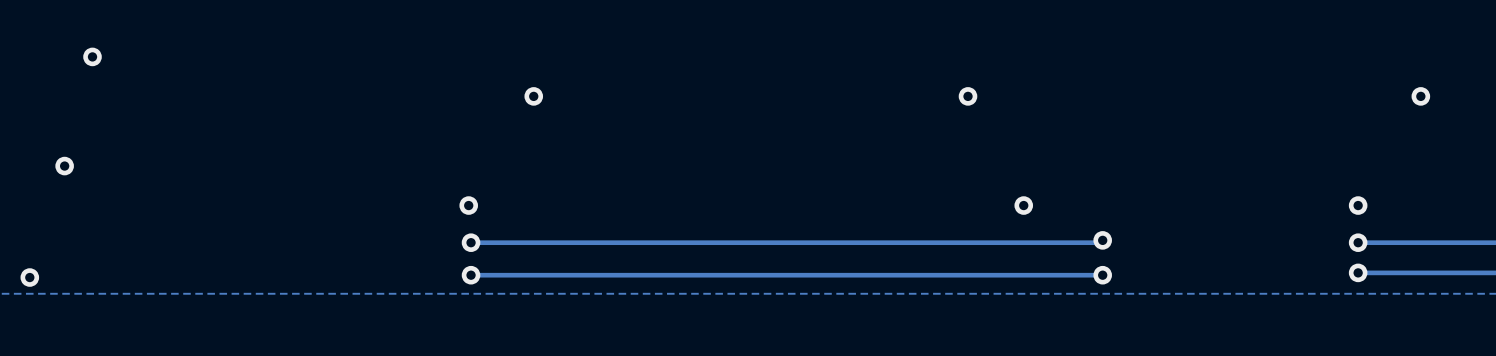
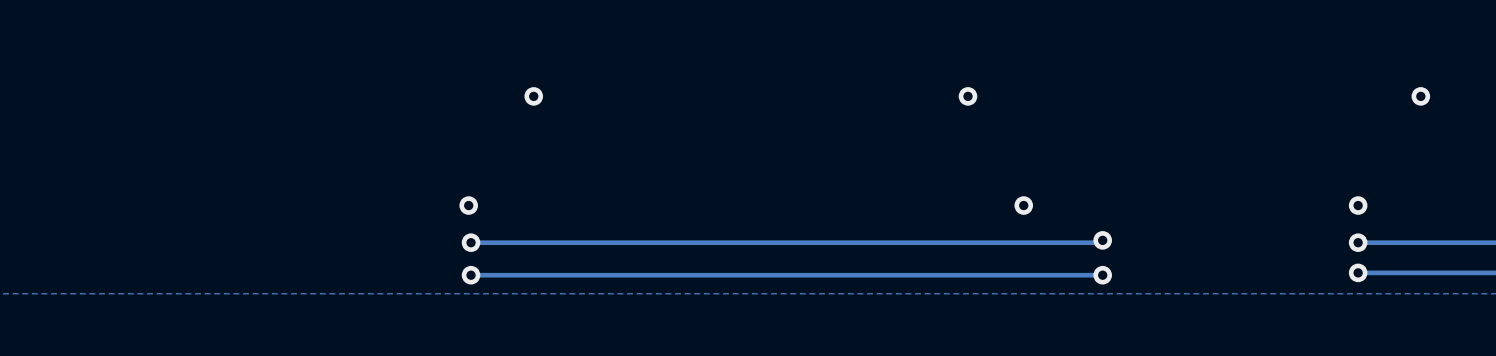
via: (92, 56) -> none
via: (64, 166) -> none
via: (29, 277) -> none

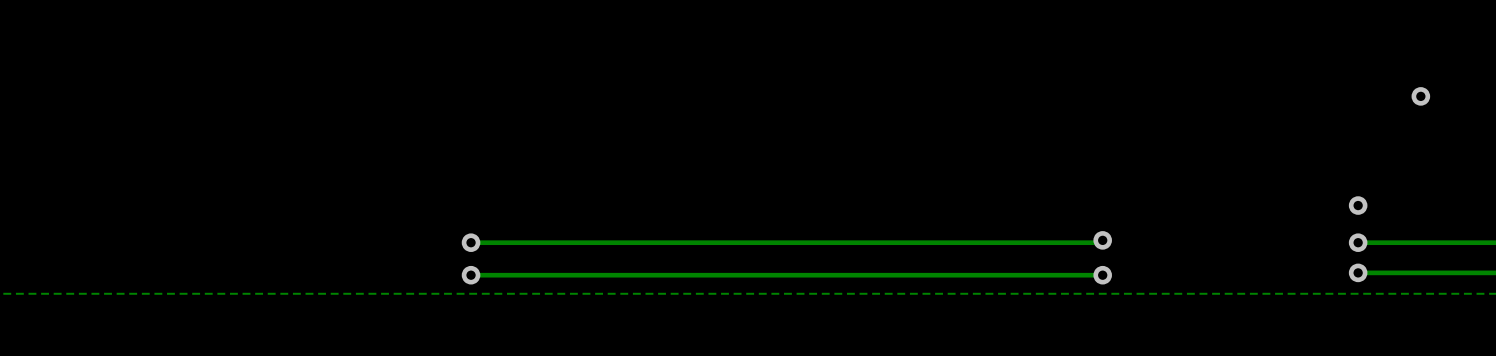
via: (533, 96) -> none
via: (968, 96) -> none
via: (468, 205) -> none
via: (1023, 205) -> none

